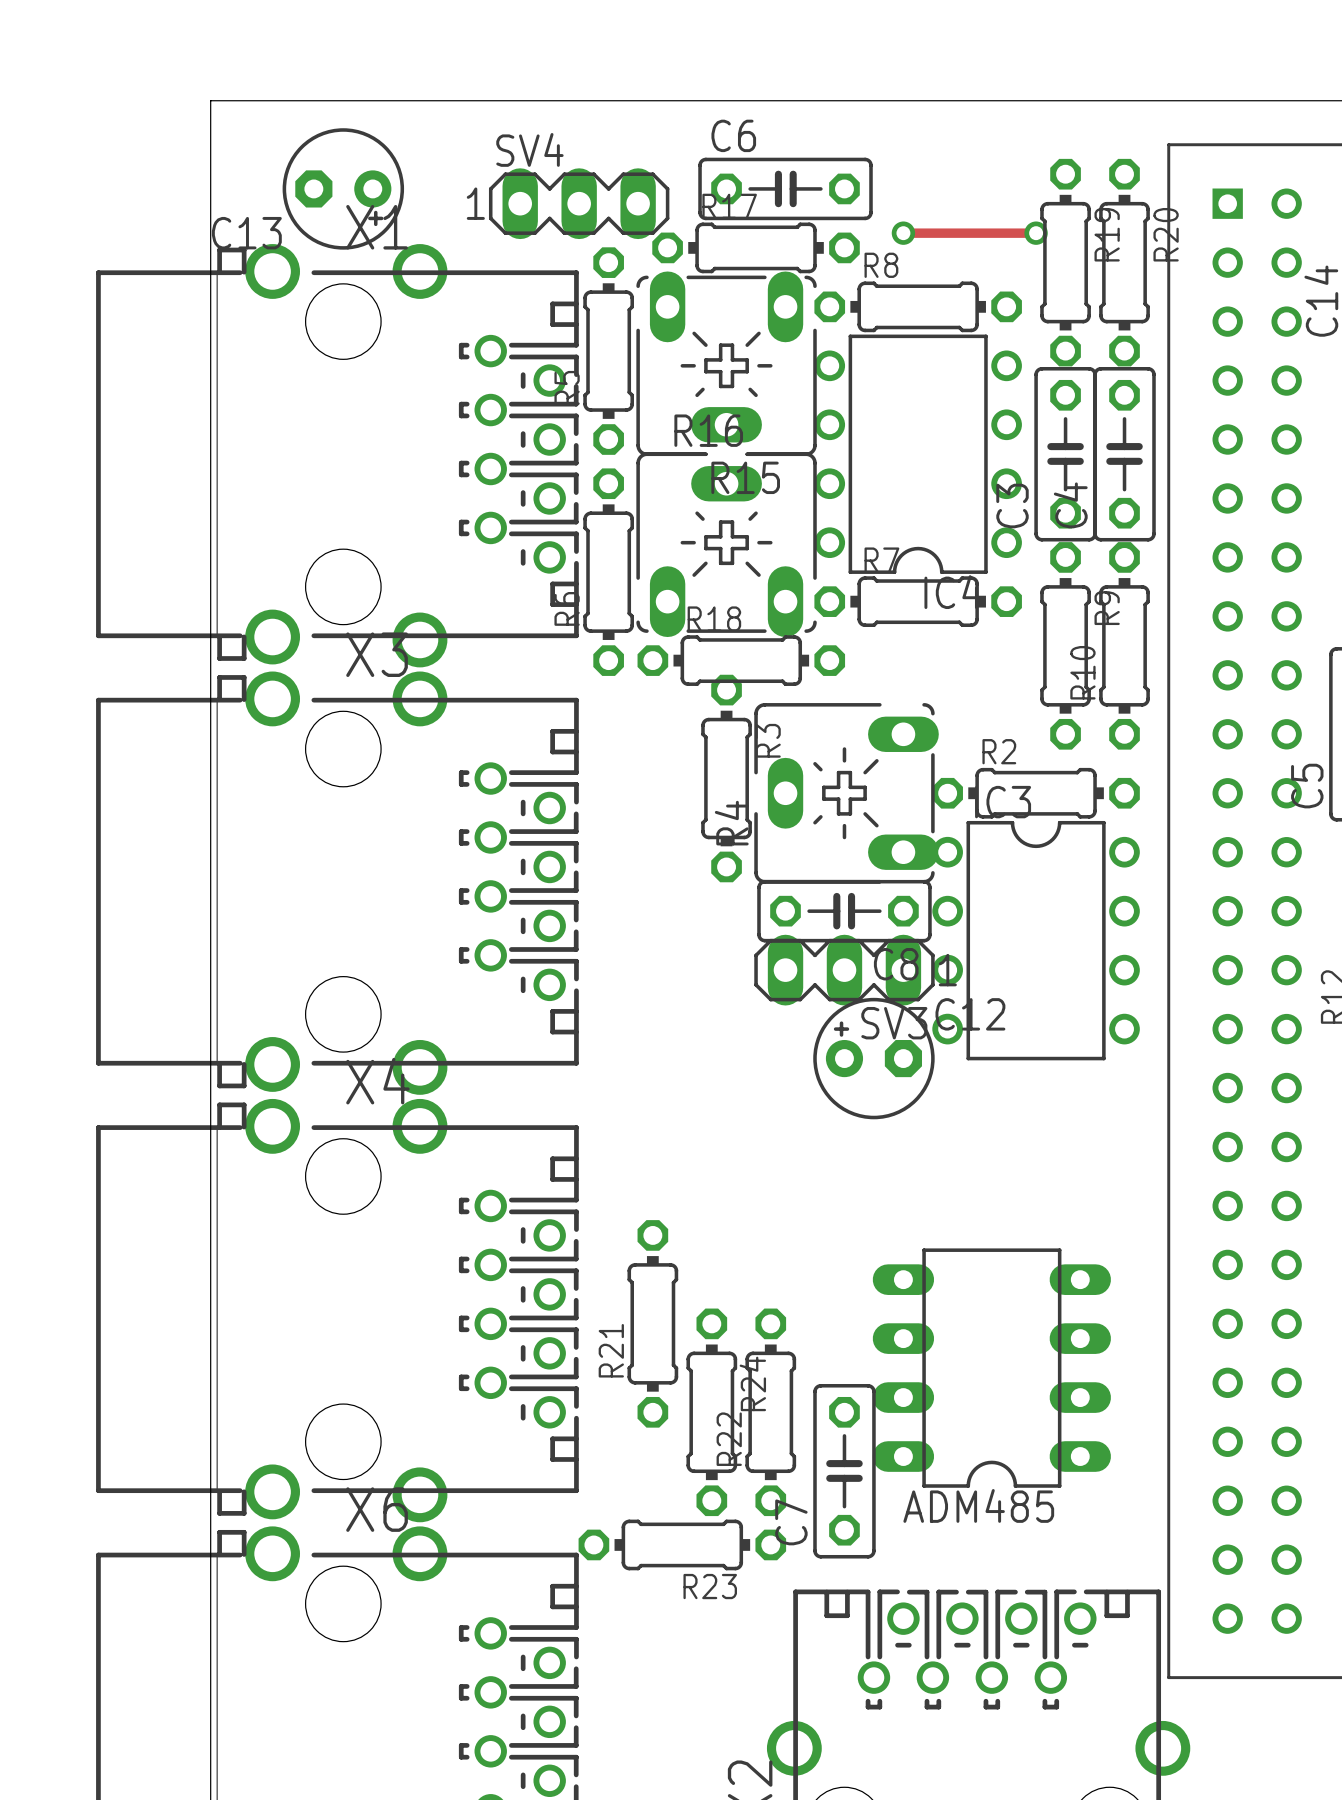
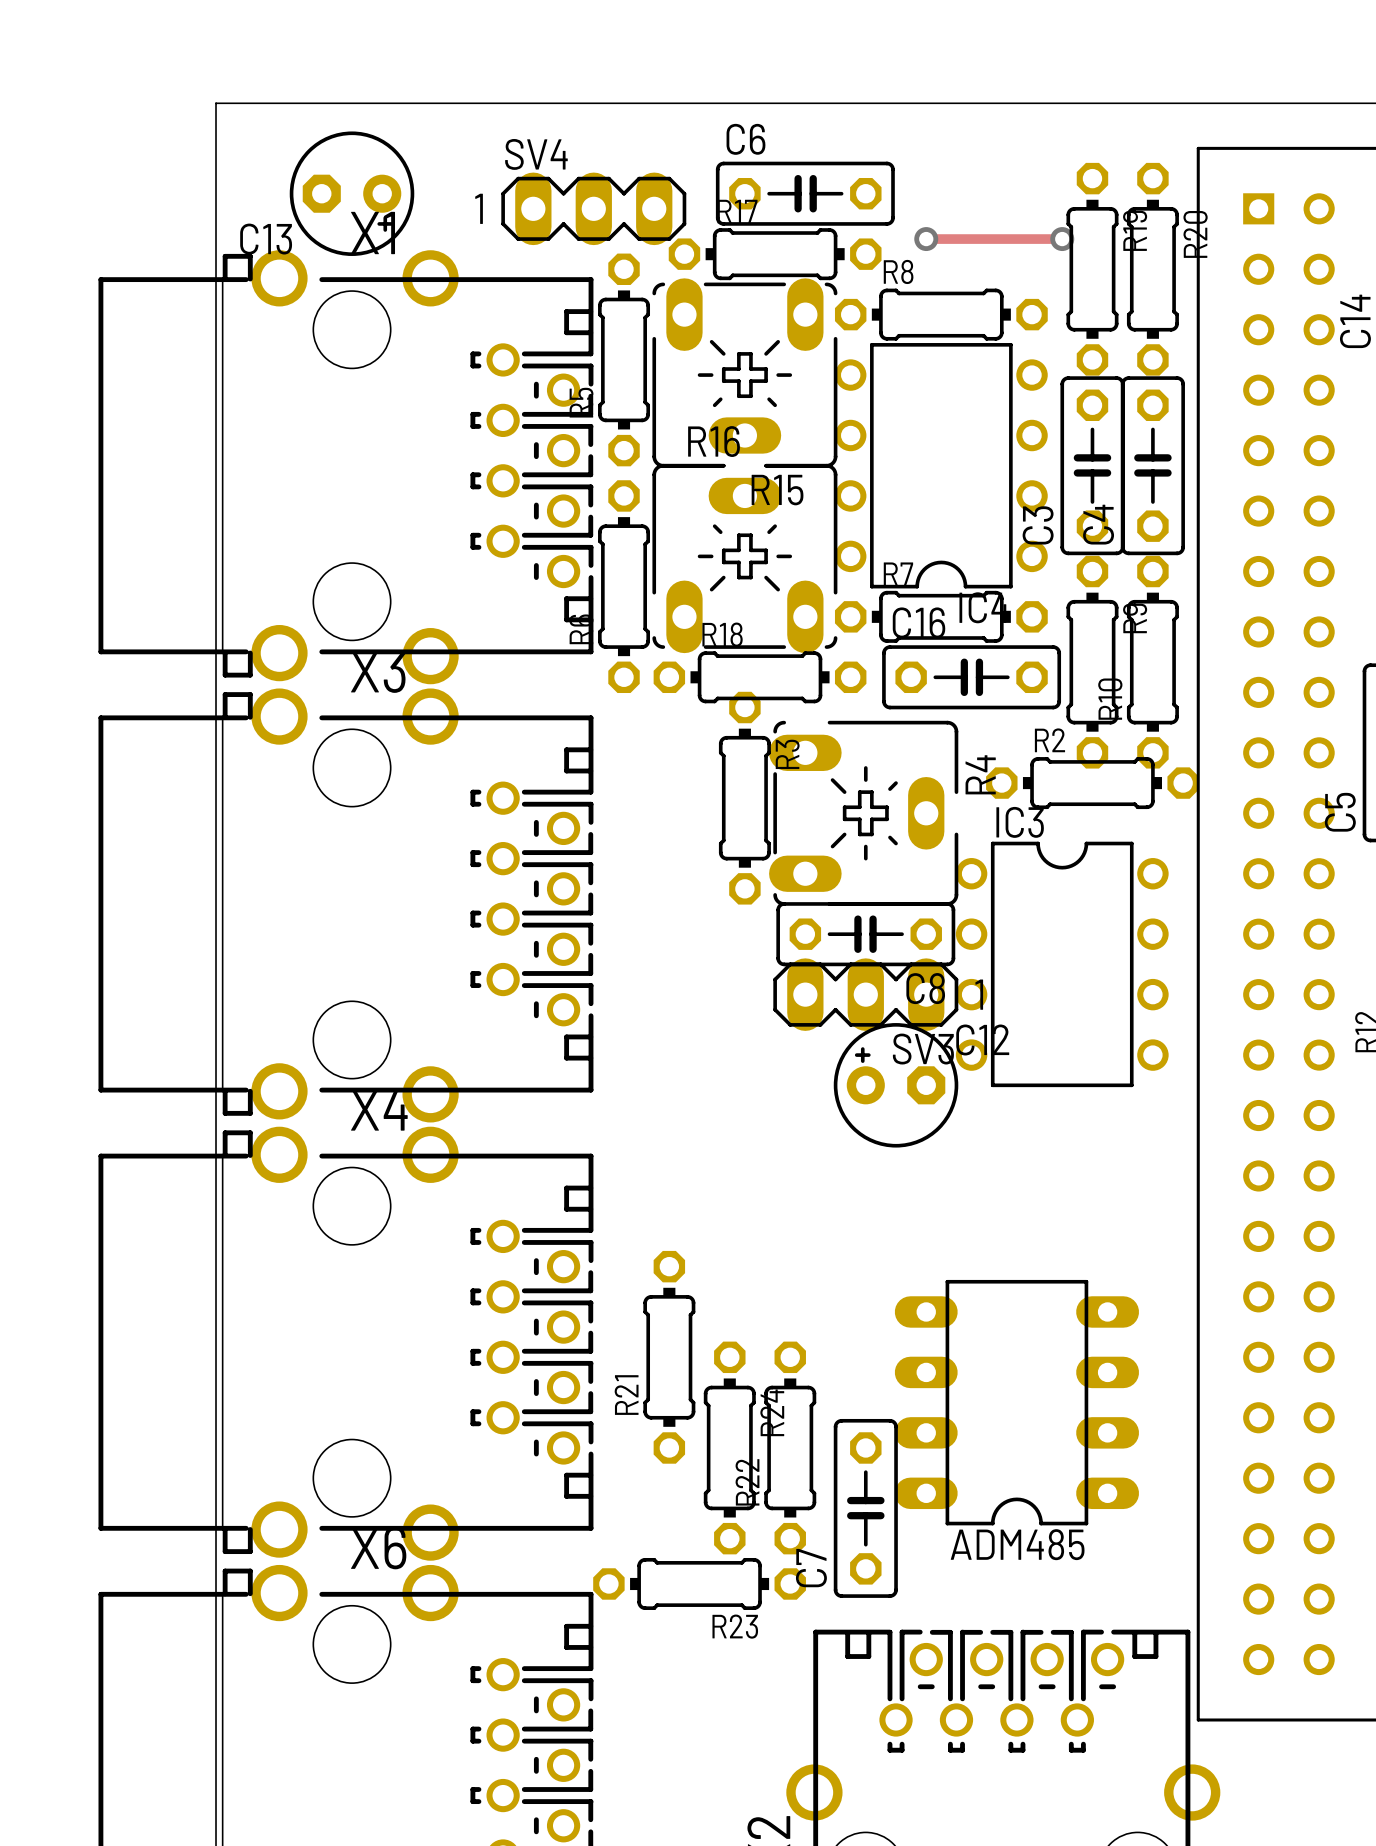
C16: none -> (971, 677)
R4 rotation: 0° (846, 793) -> 180° (863, 813)
R2 position: (1036, 793) -> (1092, 783)

